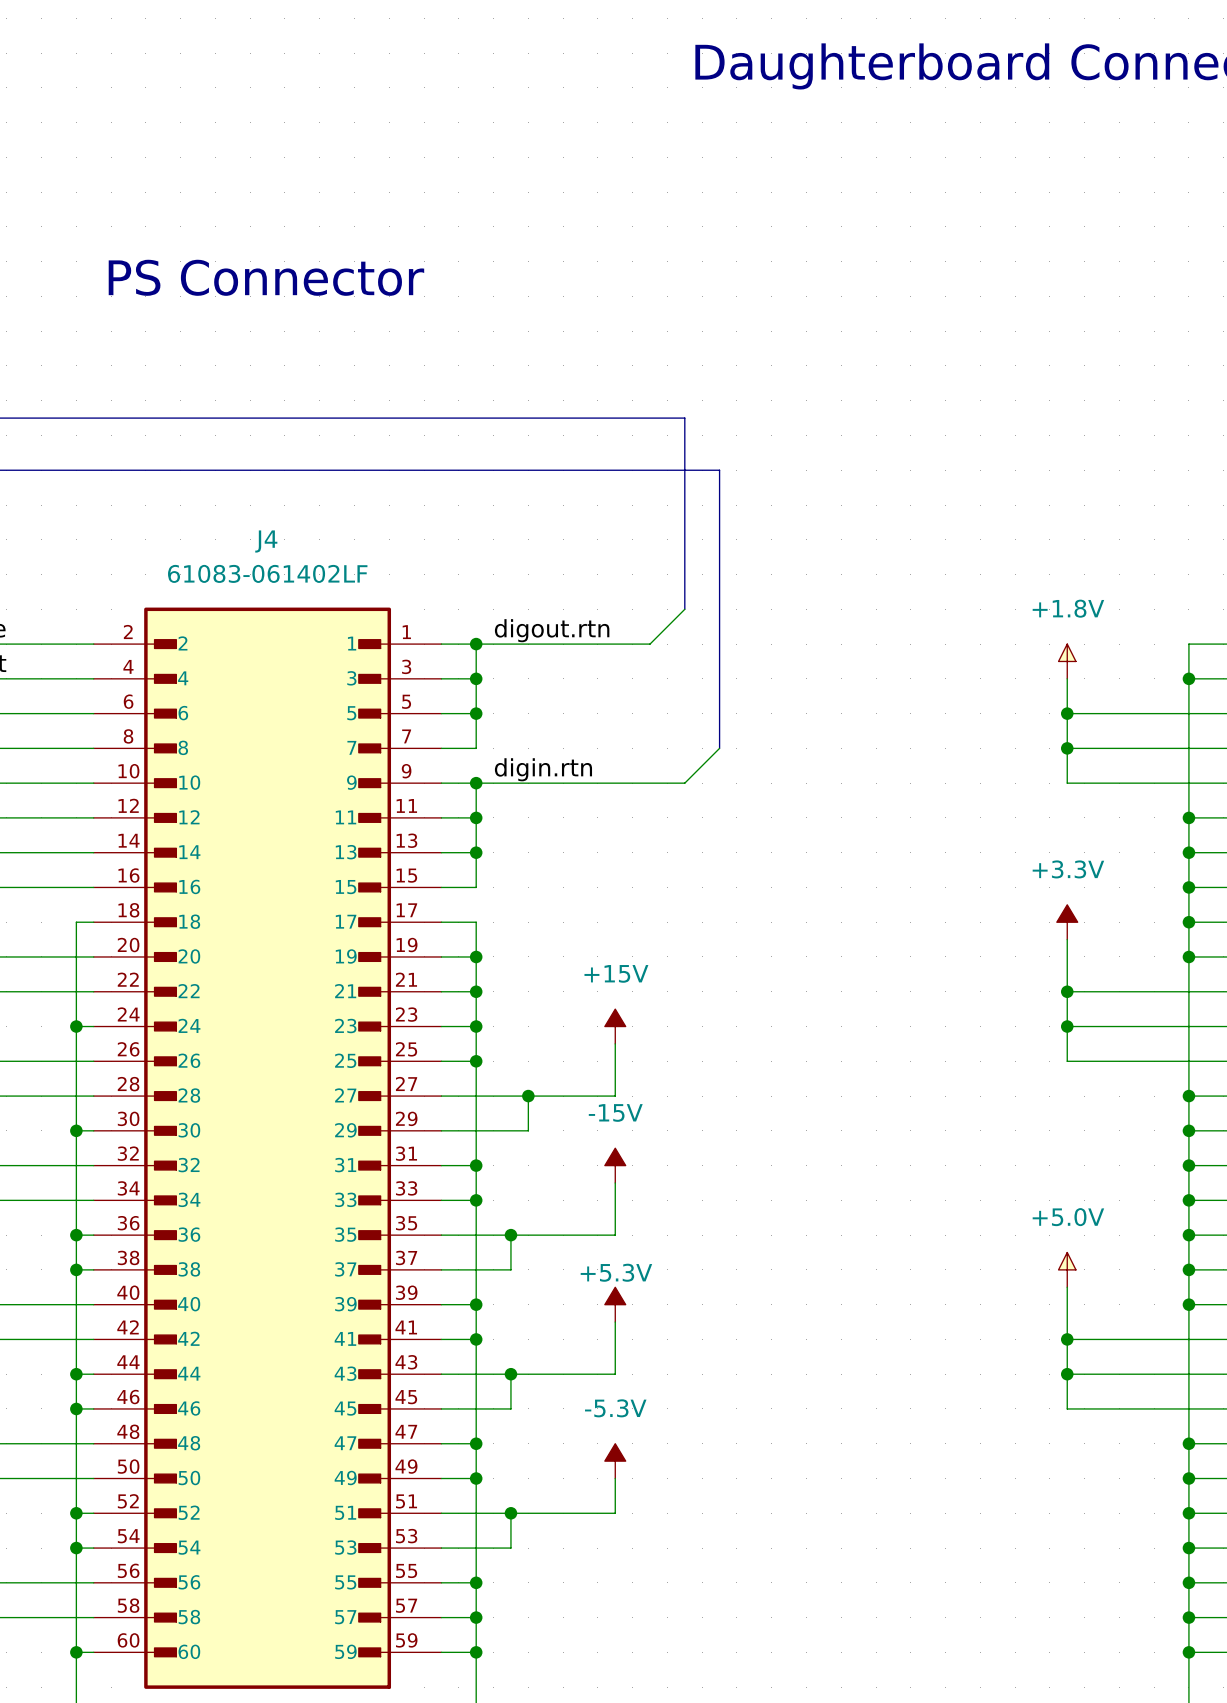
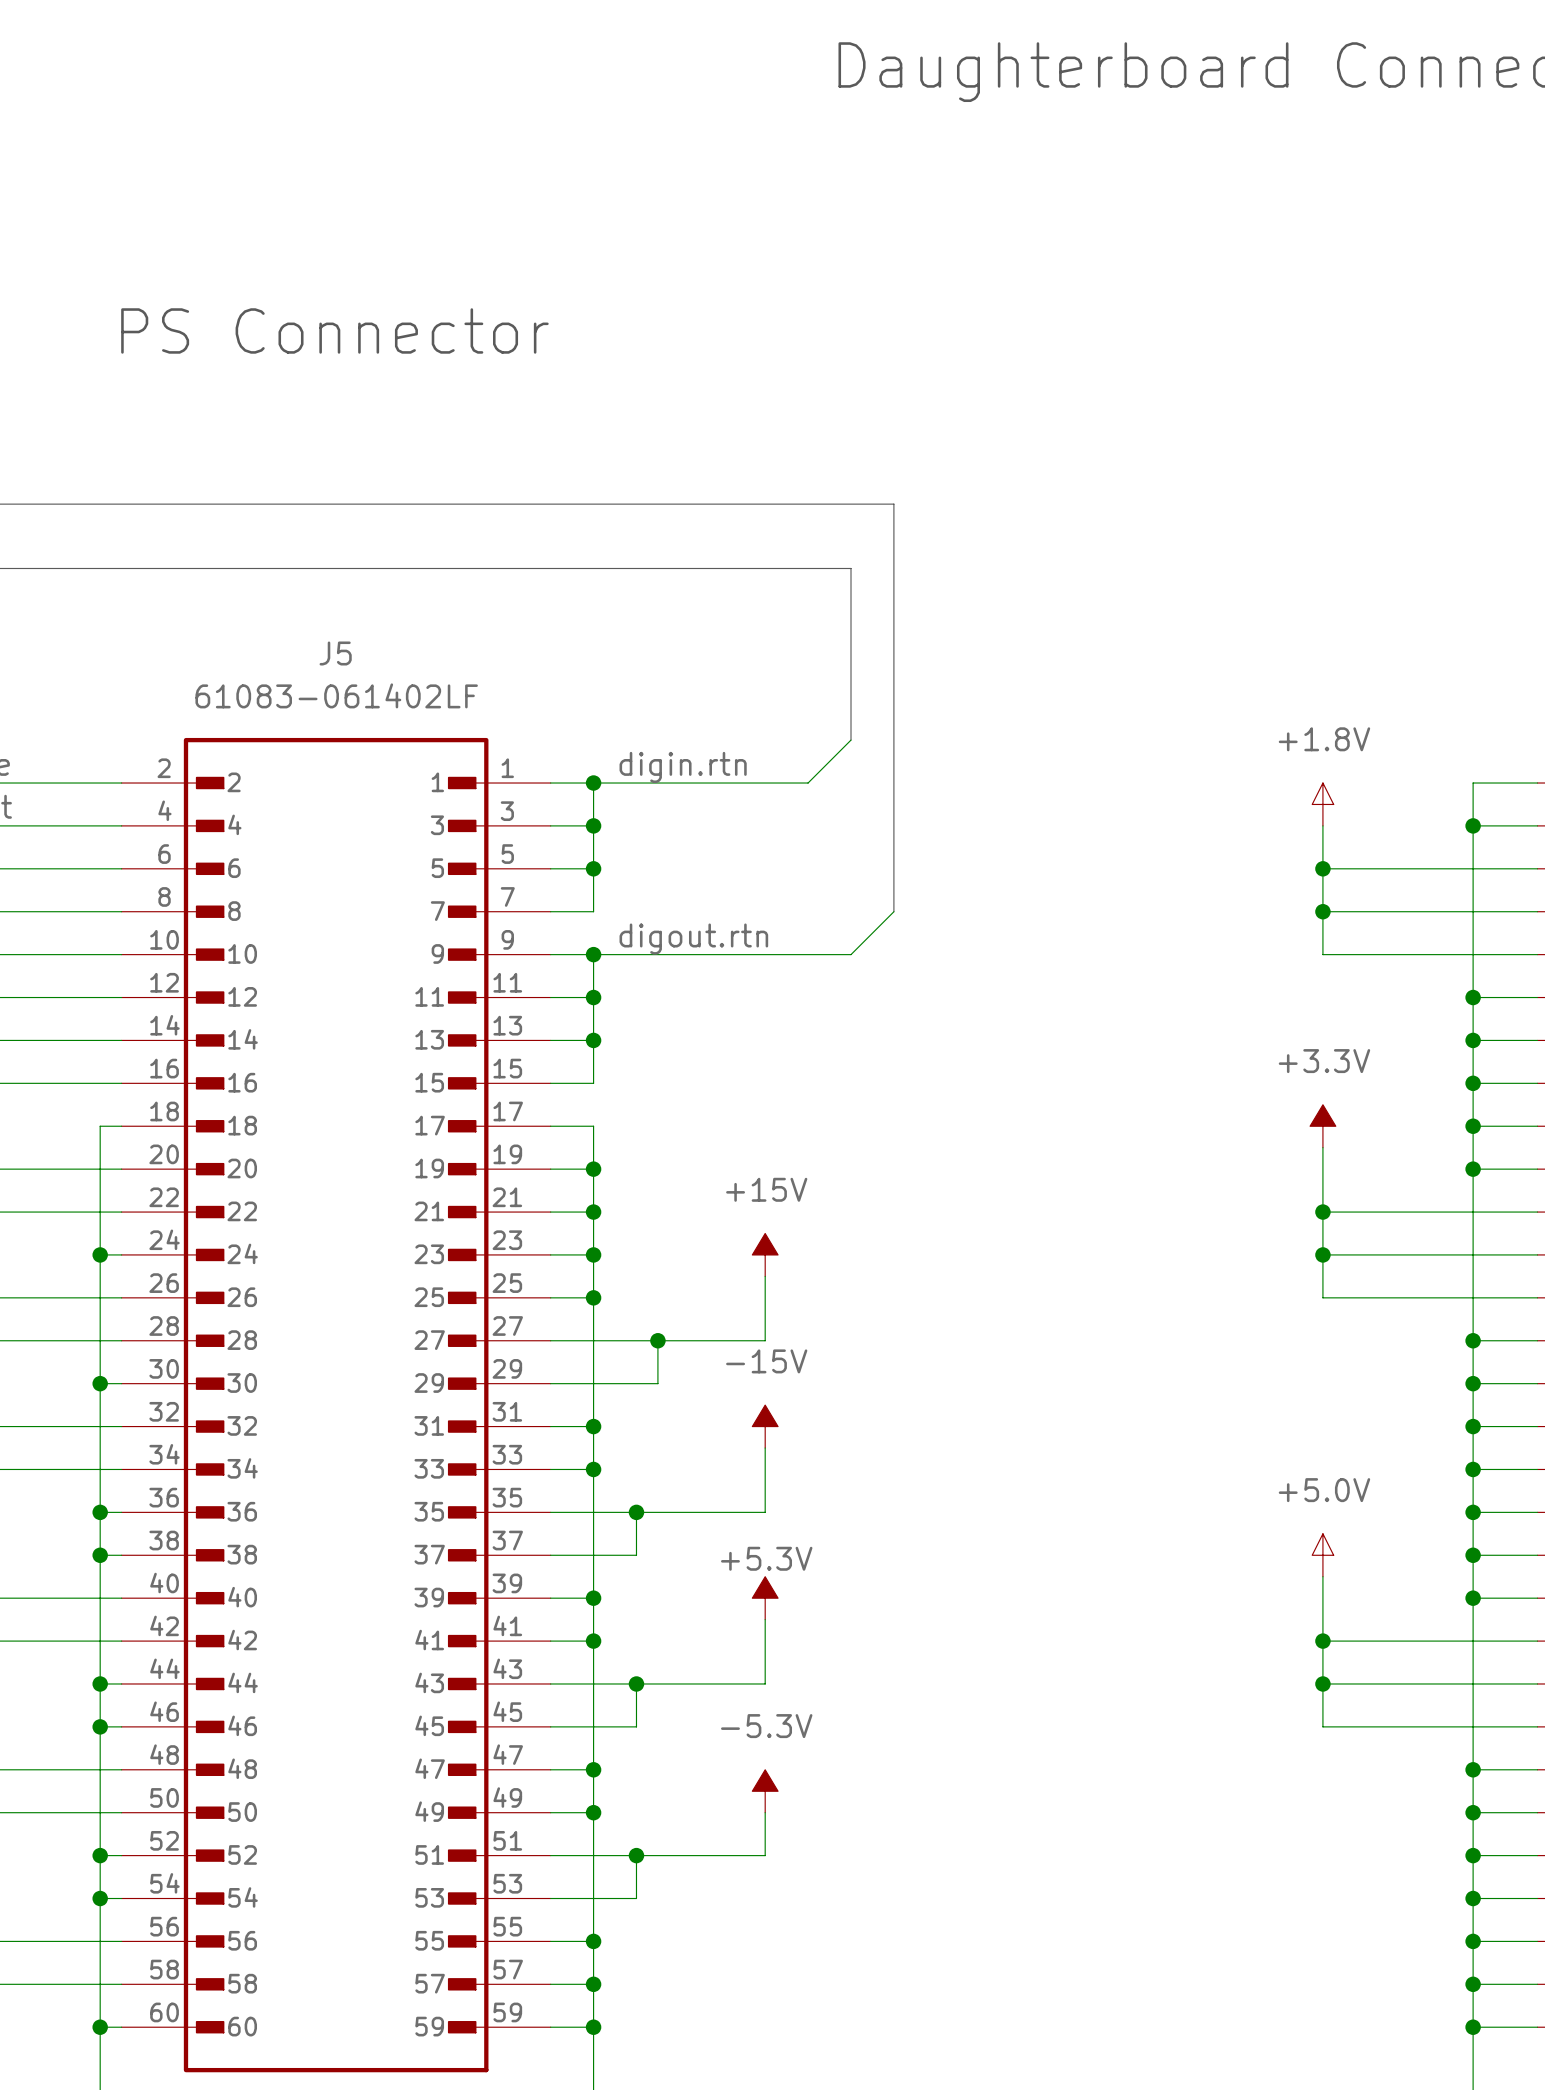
bus: (684, 418) (684, 470) (719, 470) -> (851, 504) (893, 504) (893, 568)
J4 name: J4 (266, 541) -> J5 (335, 653)
label: digout.rtn (552, 630) -> digin.rtn (683, 767)
label: digin.rtn (543, 769) -> digout.rtn (693, 939)

